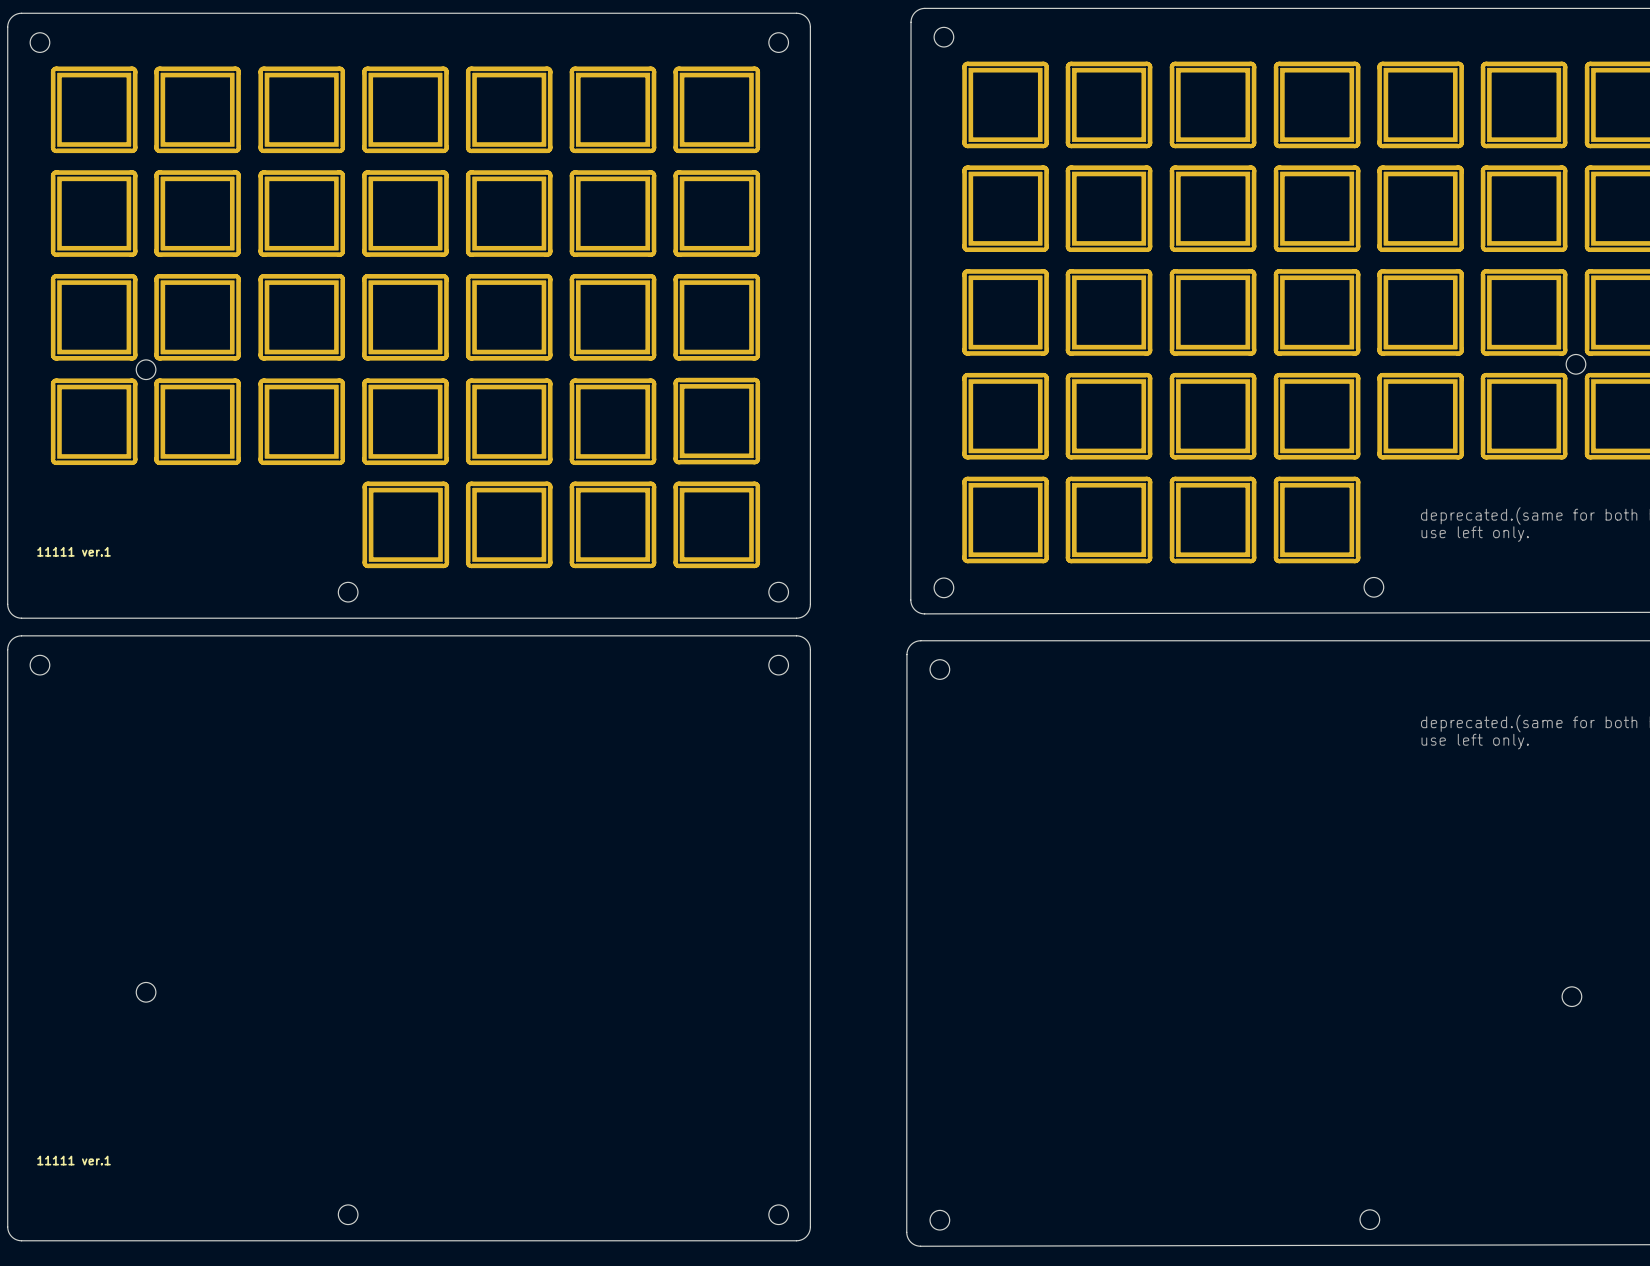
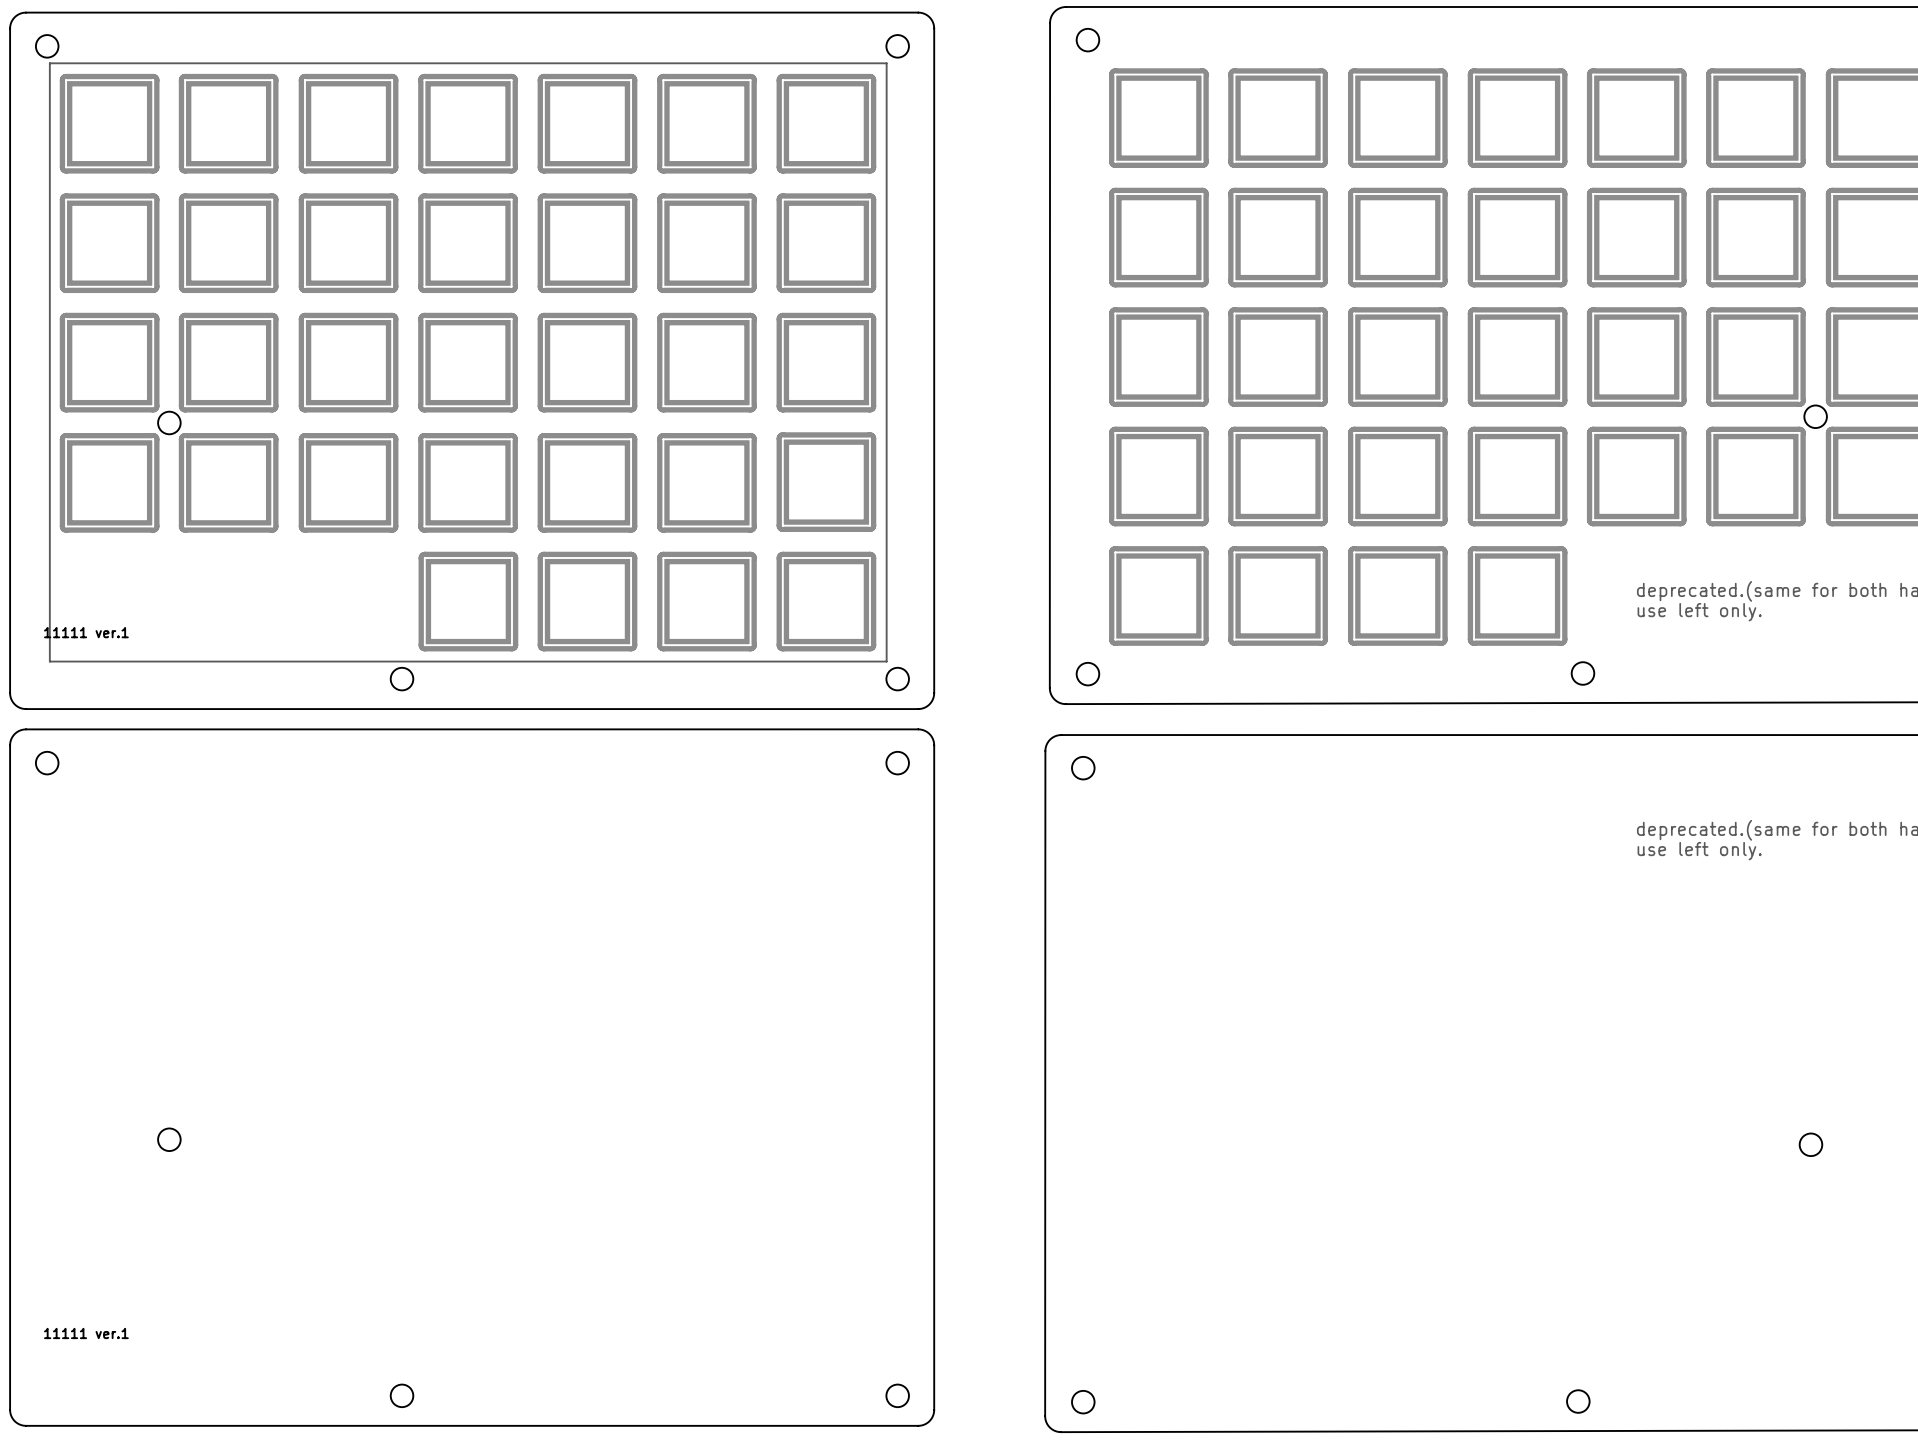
line: none -> (49, 63) (886, 63) (886, 661) (49, 661) (49, 63)

